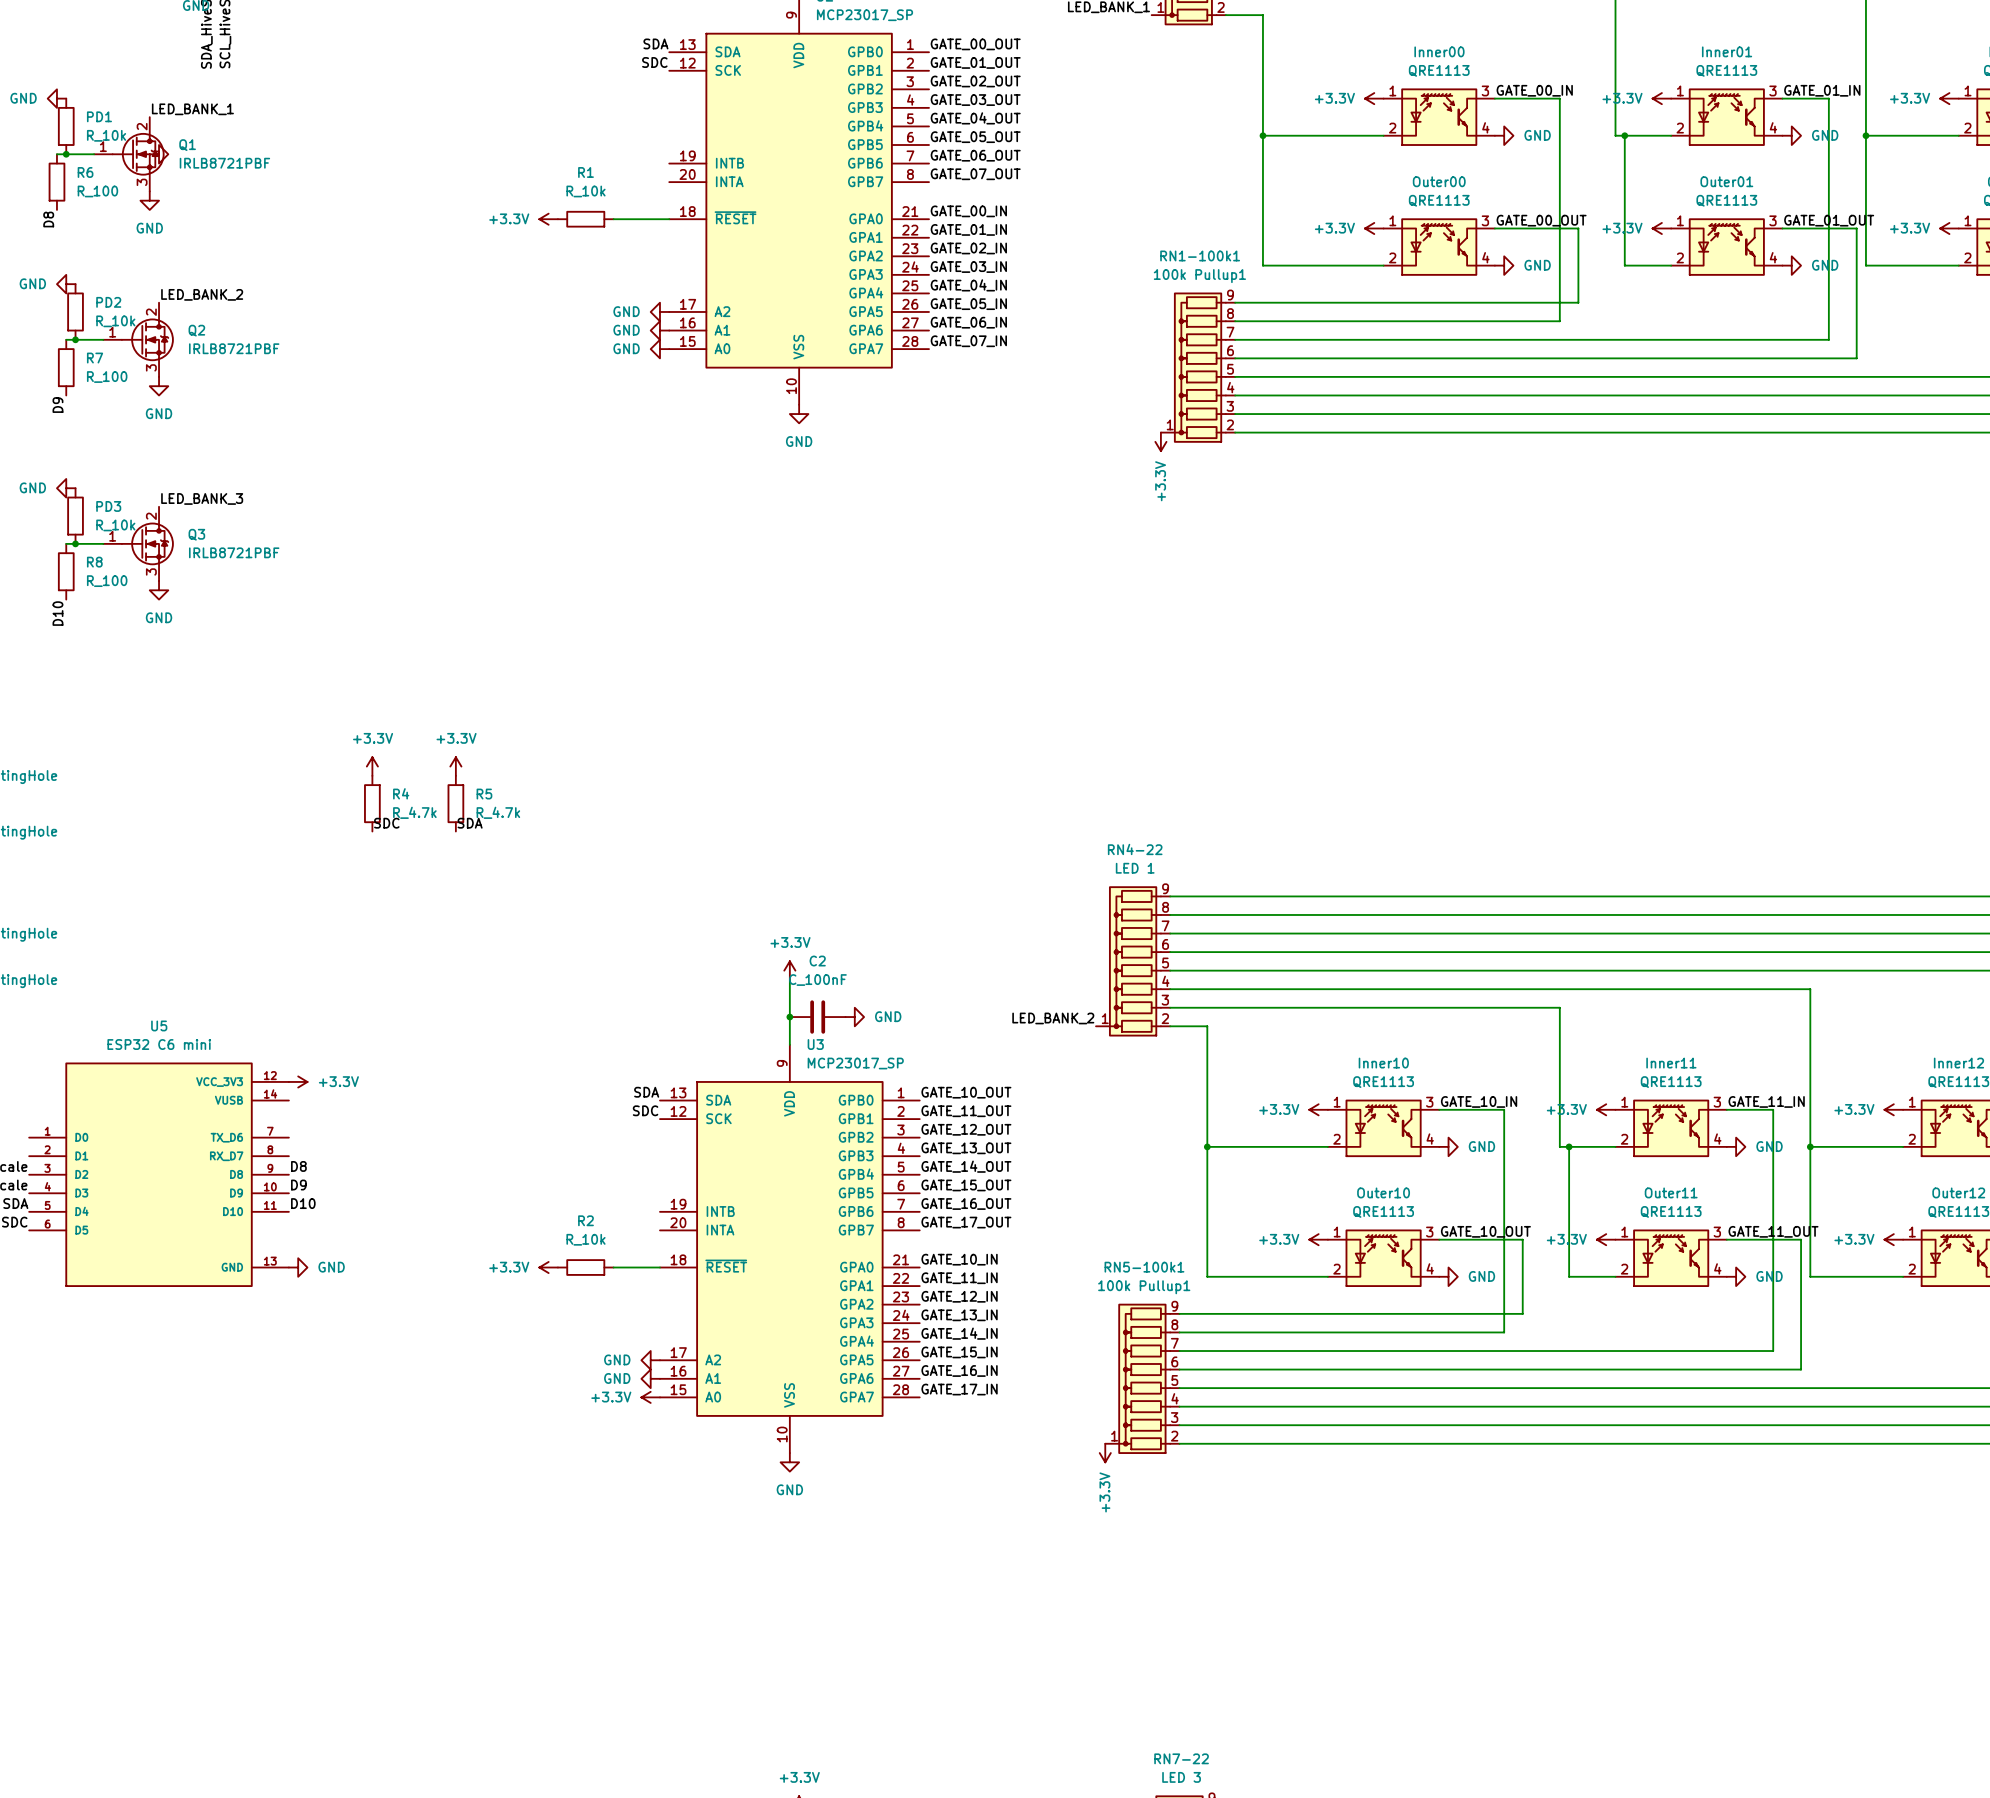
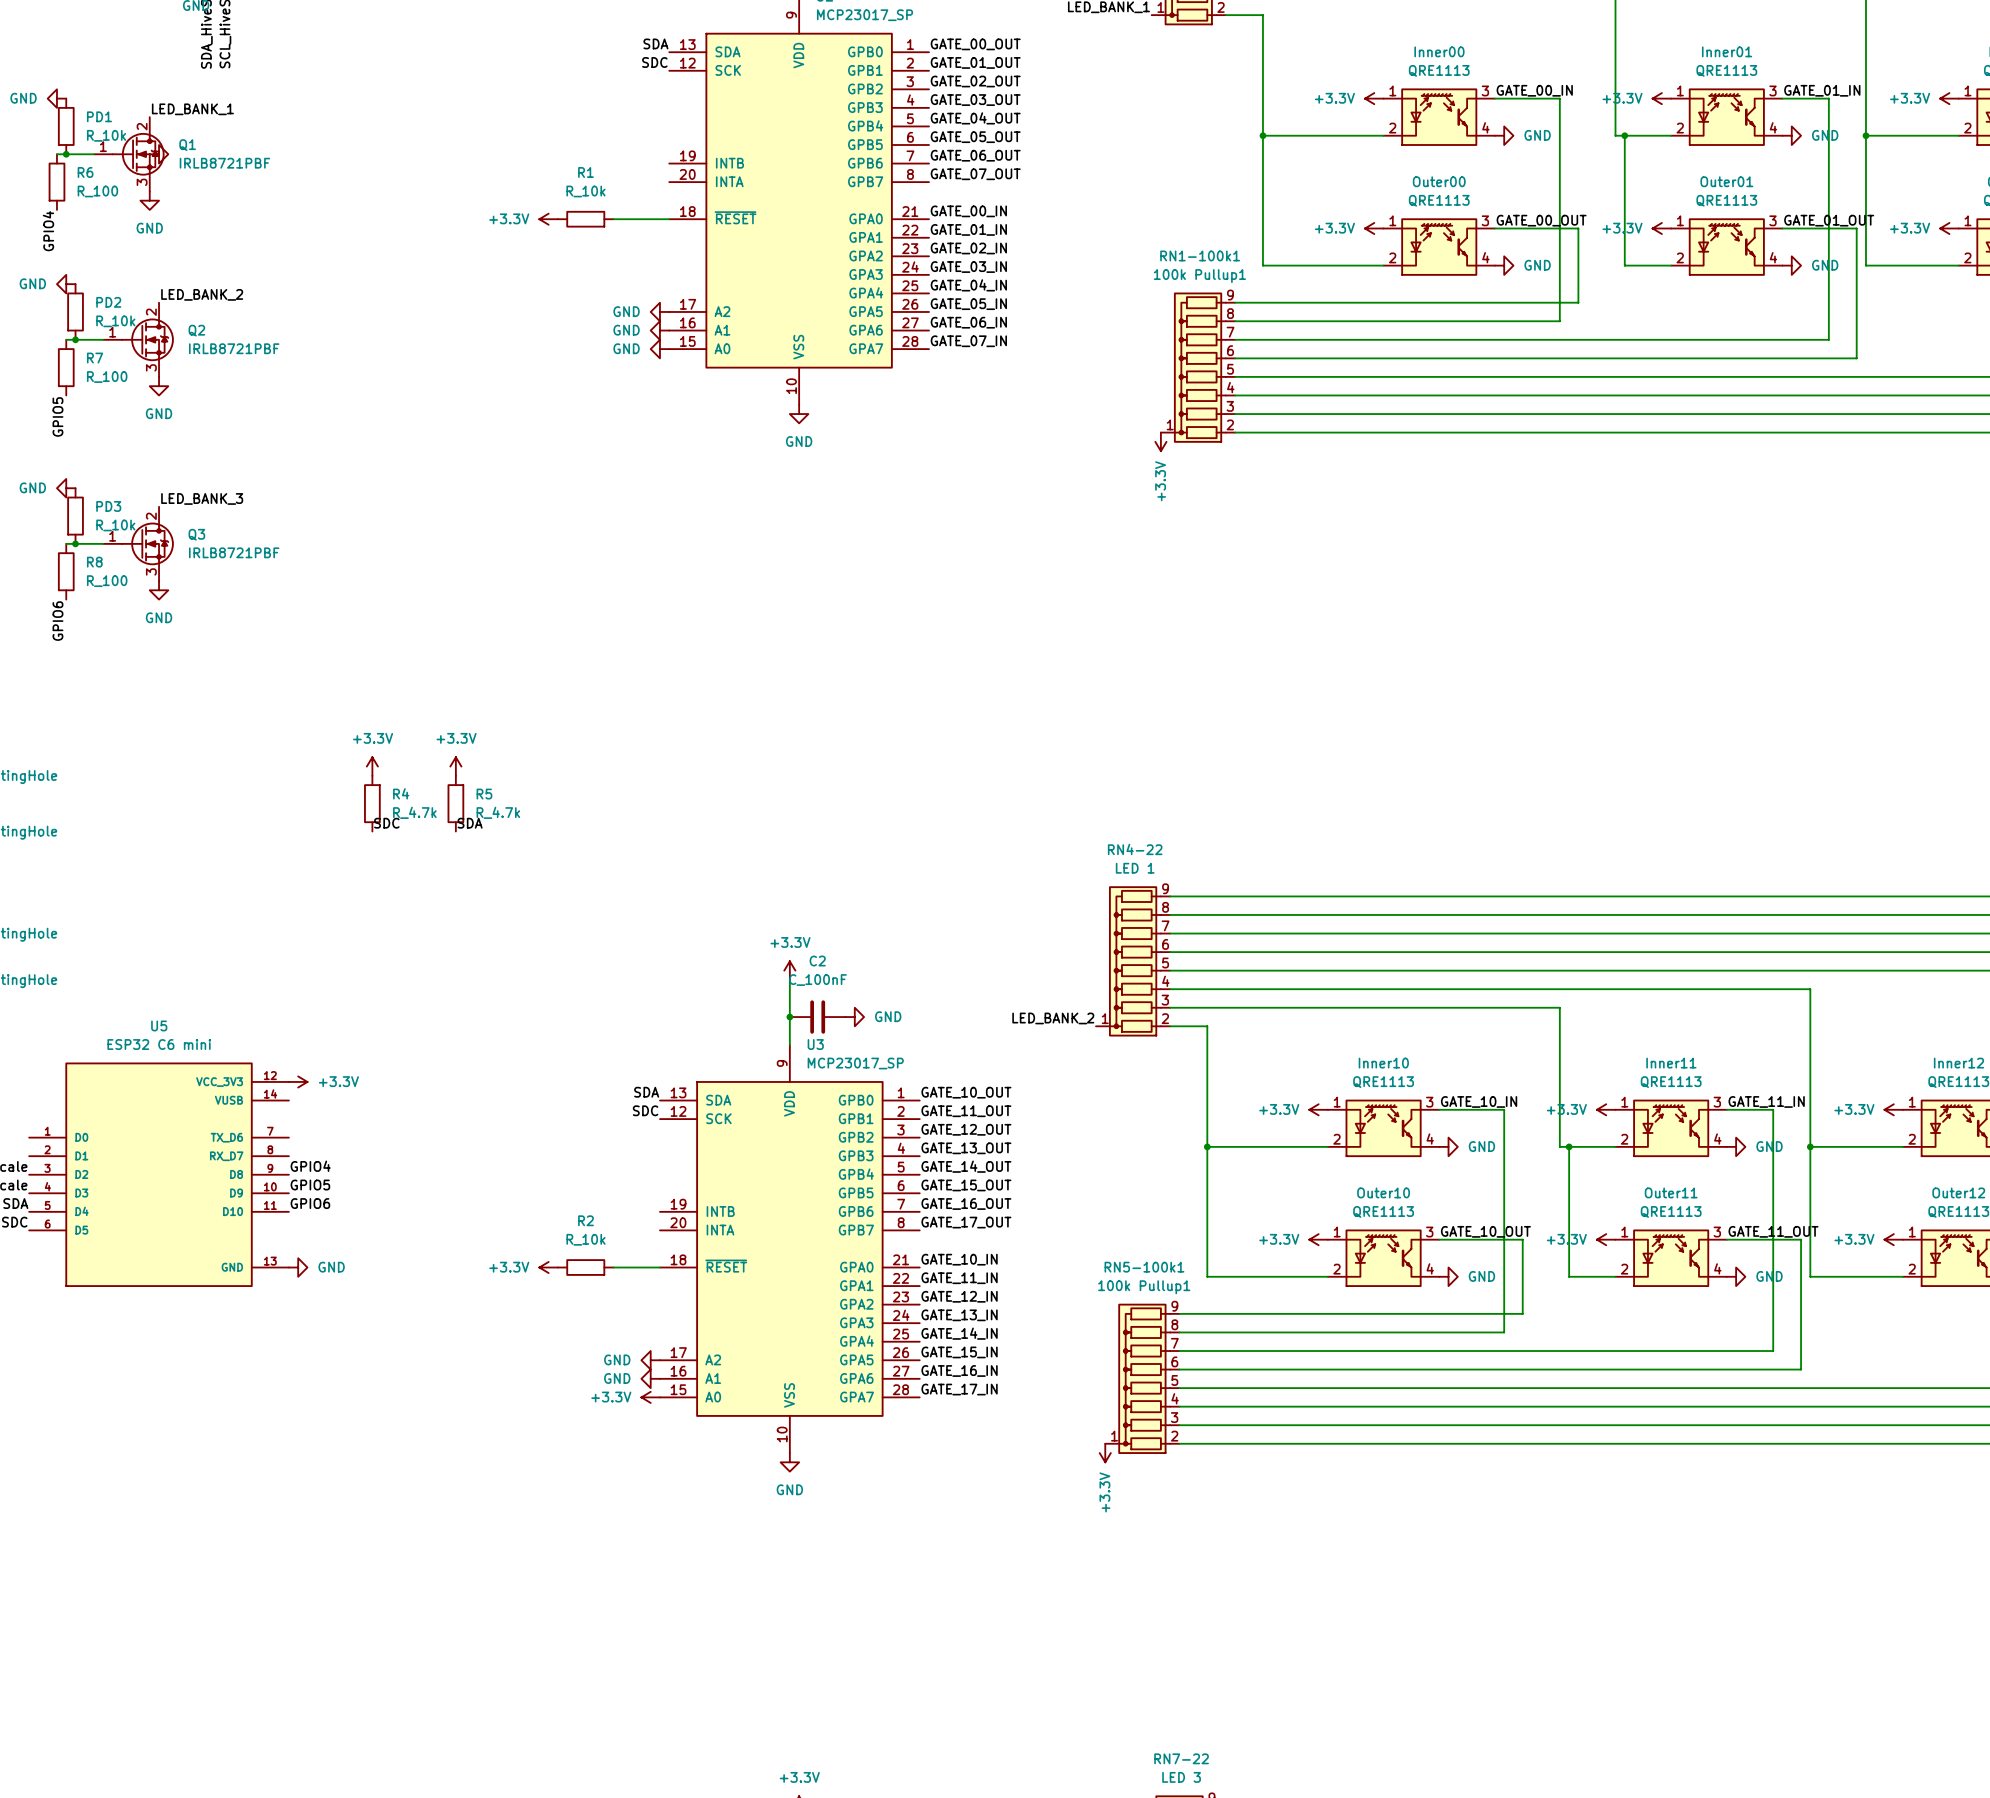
label: D8 (48, 219) -> GPIO4 (48, 231)
label: D9 (57, 405) -> GPIO5 (57, 416)
label: D10 (57, 613) -> GPIO6 (57, 621)
label: D8 (298, 1166) -> GPIO4 (310, 1166)
label: D9 (298, 1185) -> GPIO5 (310, 1185)
label: D10 (303, 1203) -> GPIO6 (310, 1203)

